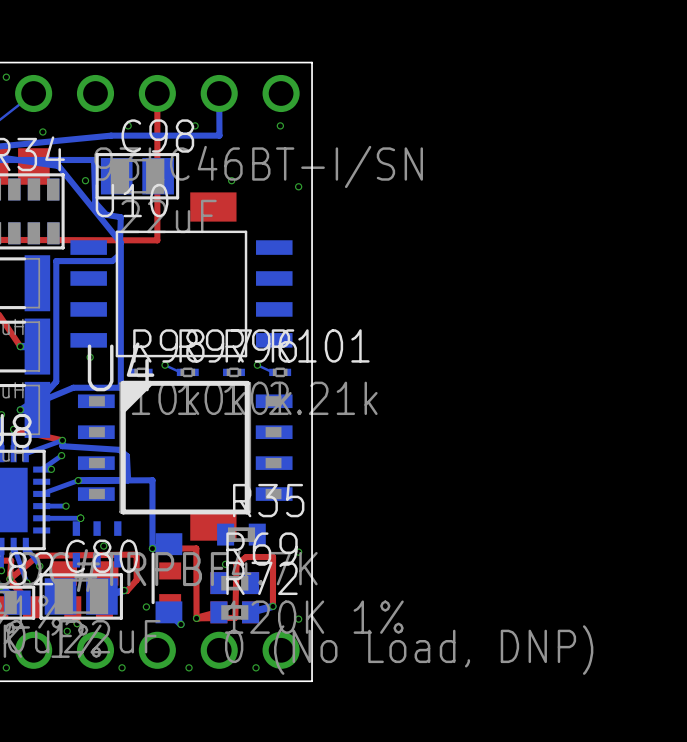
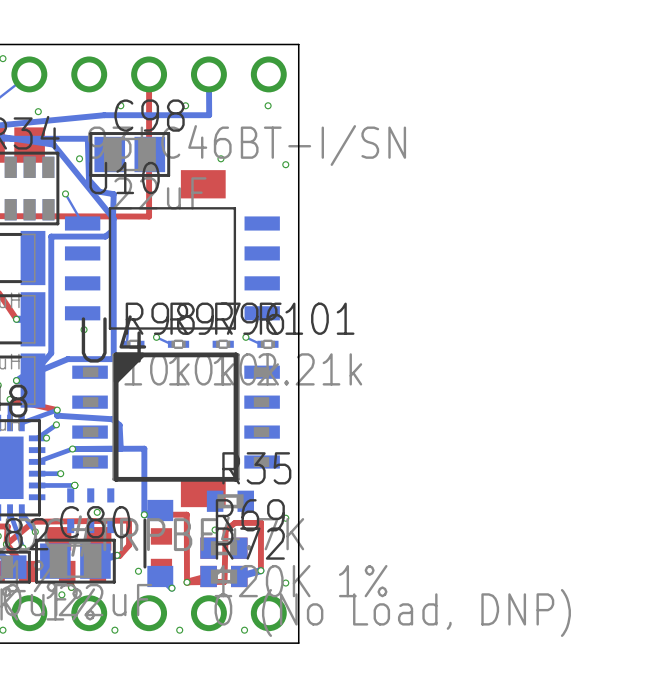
bottom track: none -> (65, 193) (82, 223)
via: none -> (65, 193)
bottom track: none -> (128, 327) (126, 344)

